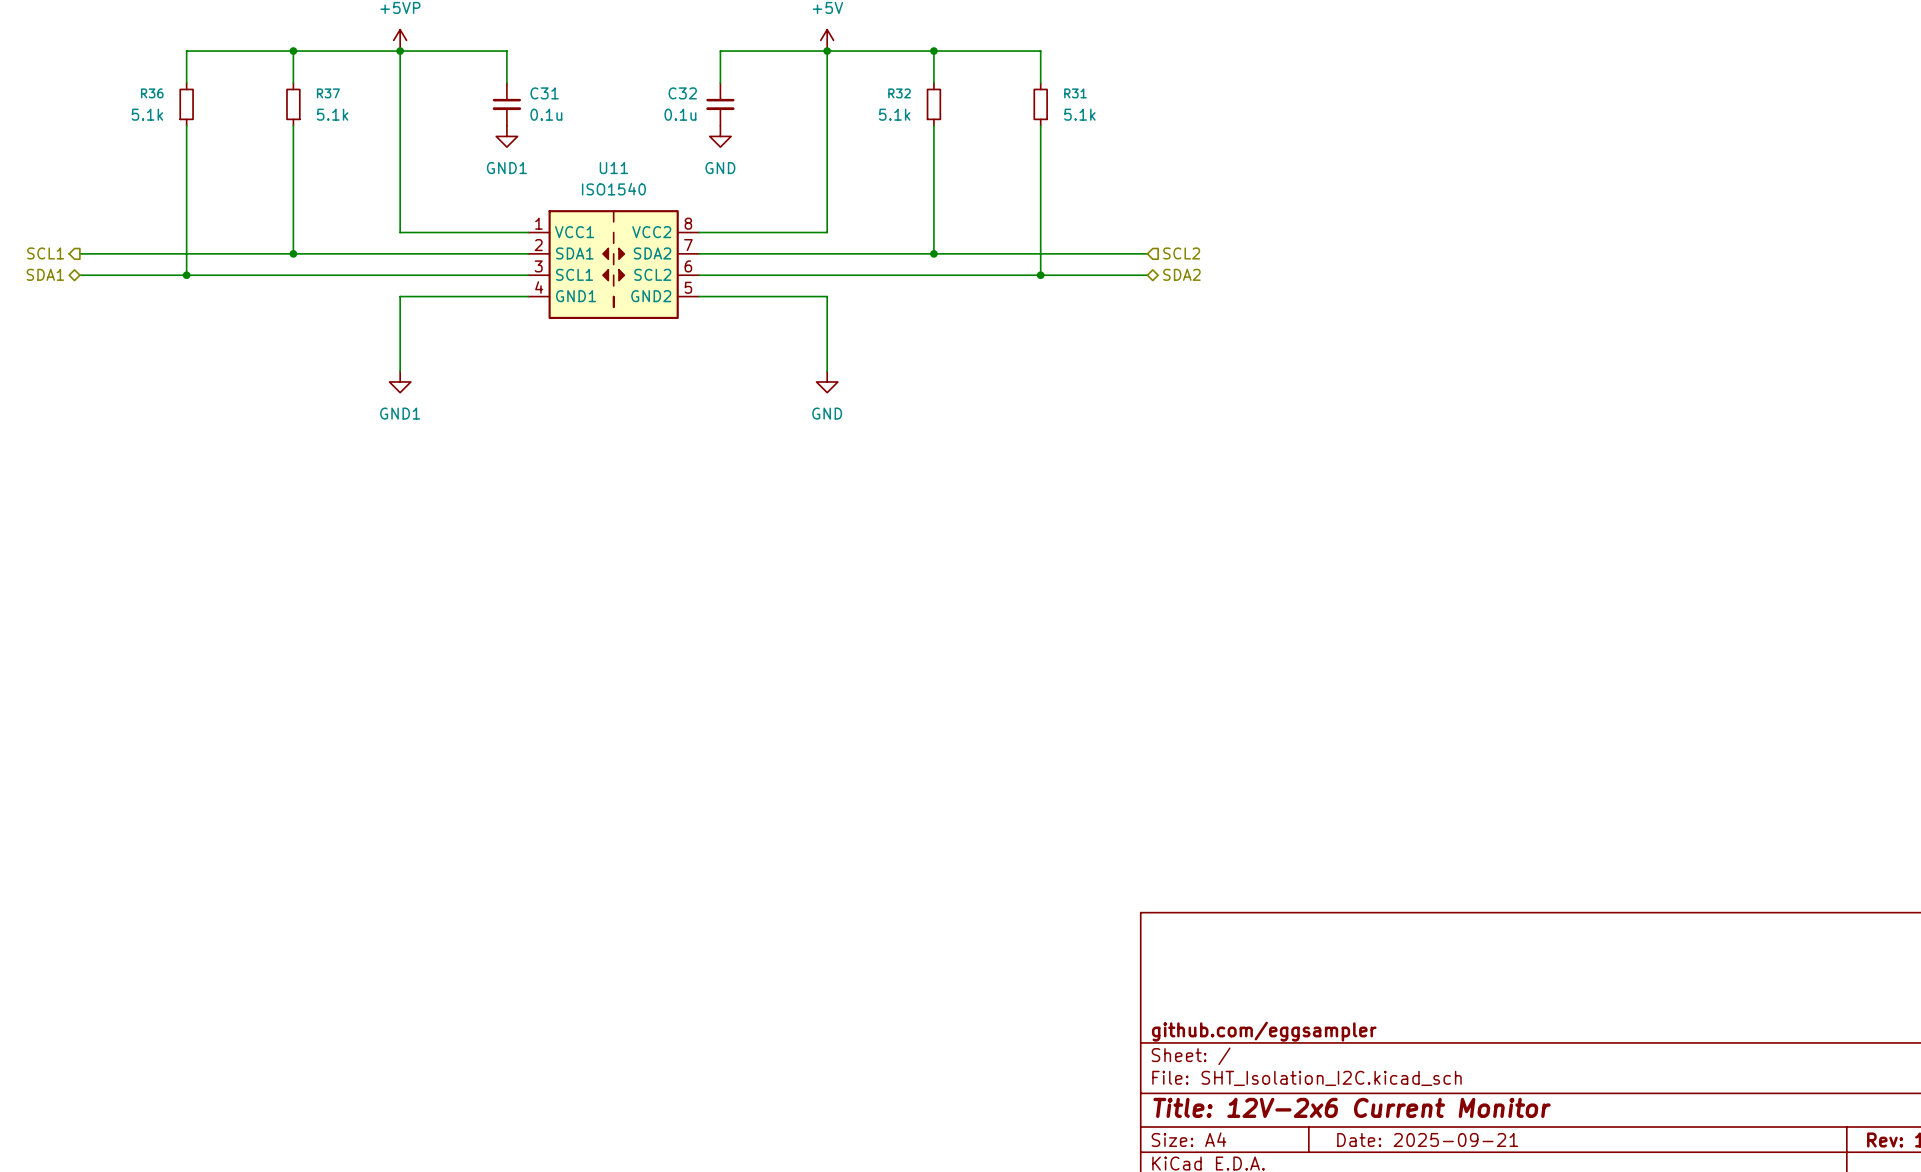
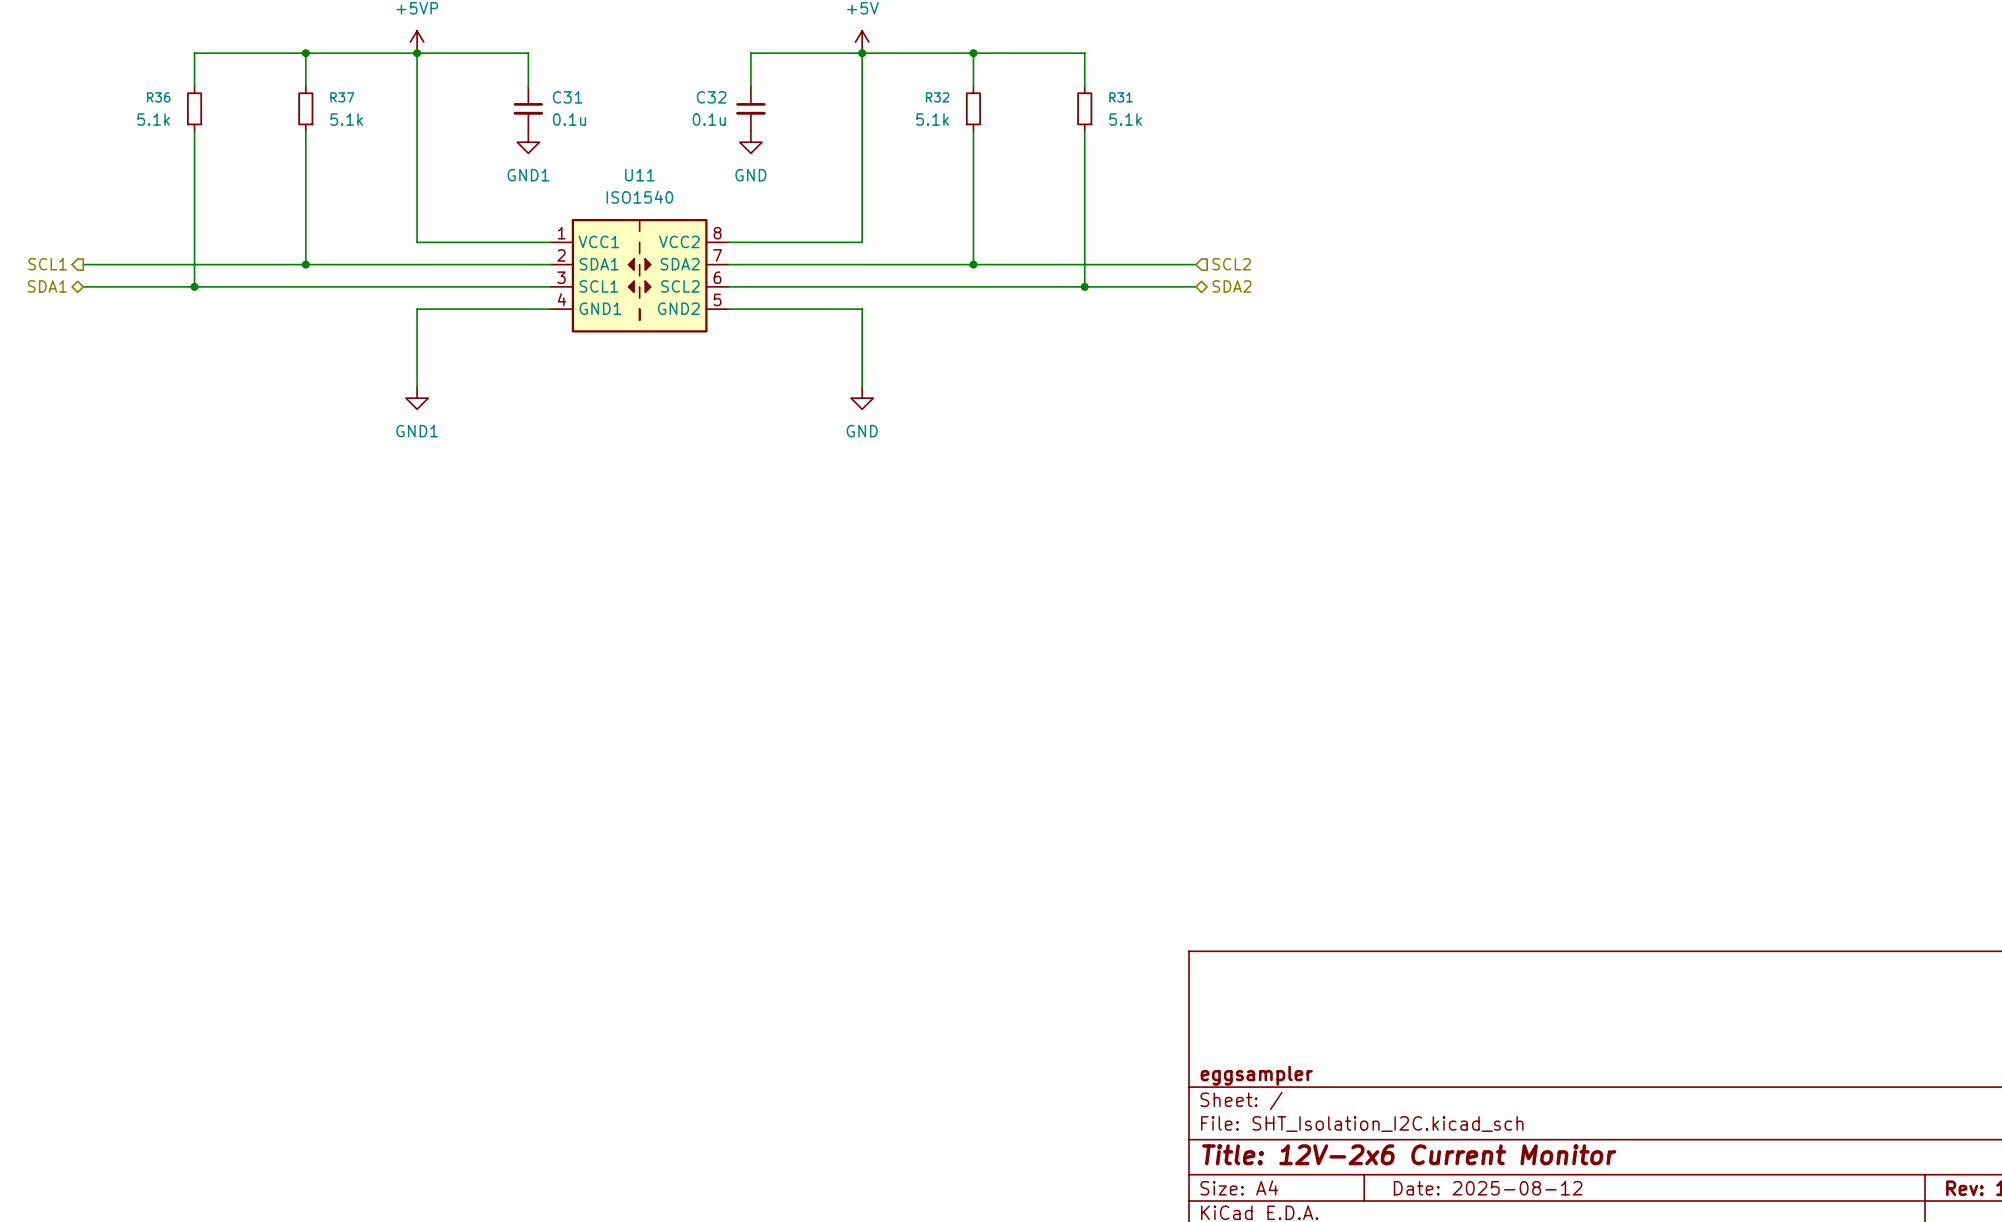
title block: github.com/eggsampler (1264, 1031) -> eggsampler (1256, 1075)
title block: Date: 2025-09-21 (1427, 1139) -> Date: 2025-08-12 (1488, 1188)

